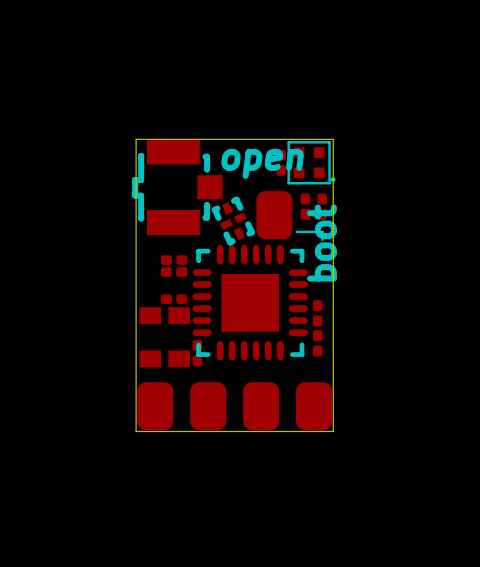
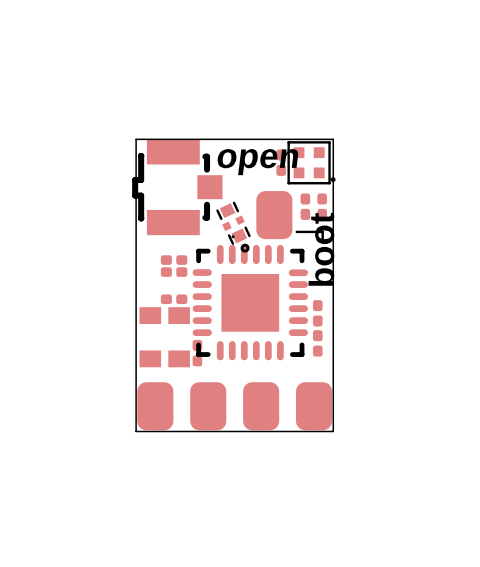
part footprint: [211, 196, 255, 246] -> [216, 201, 251, 253]

